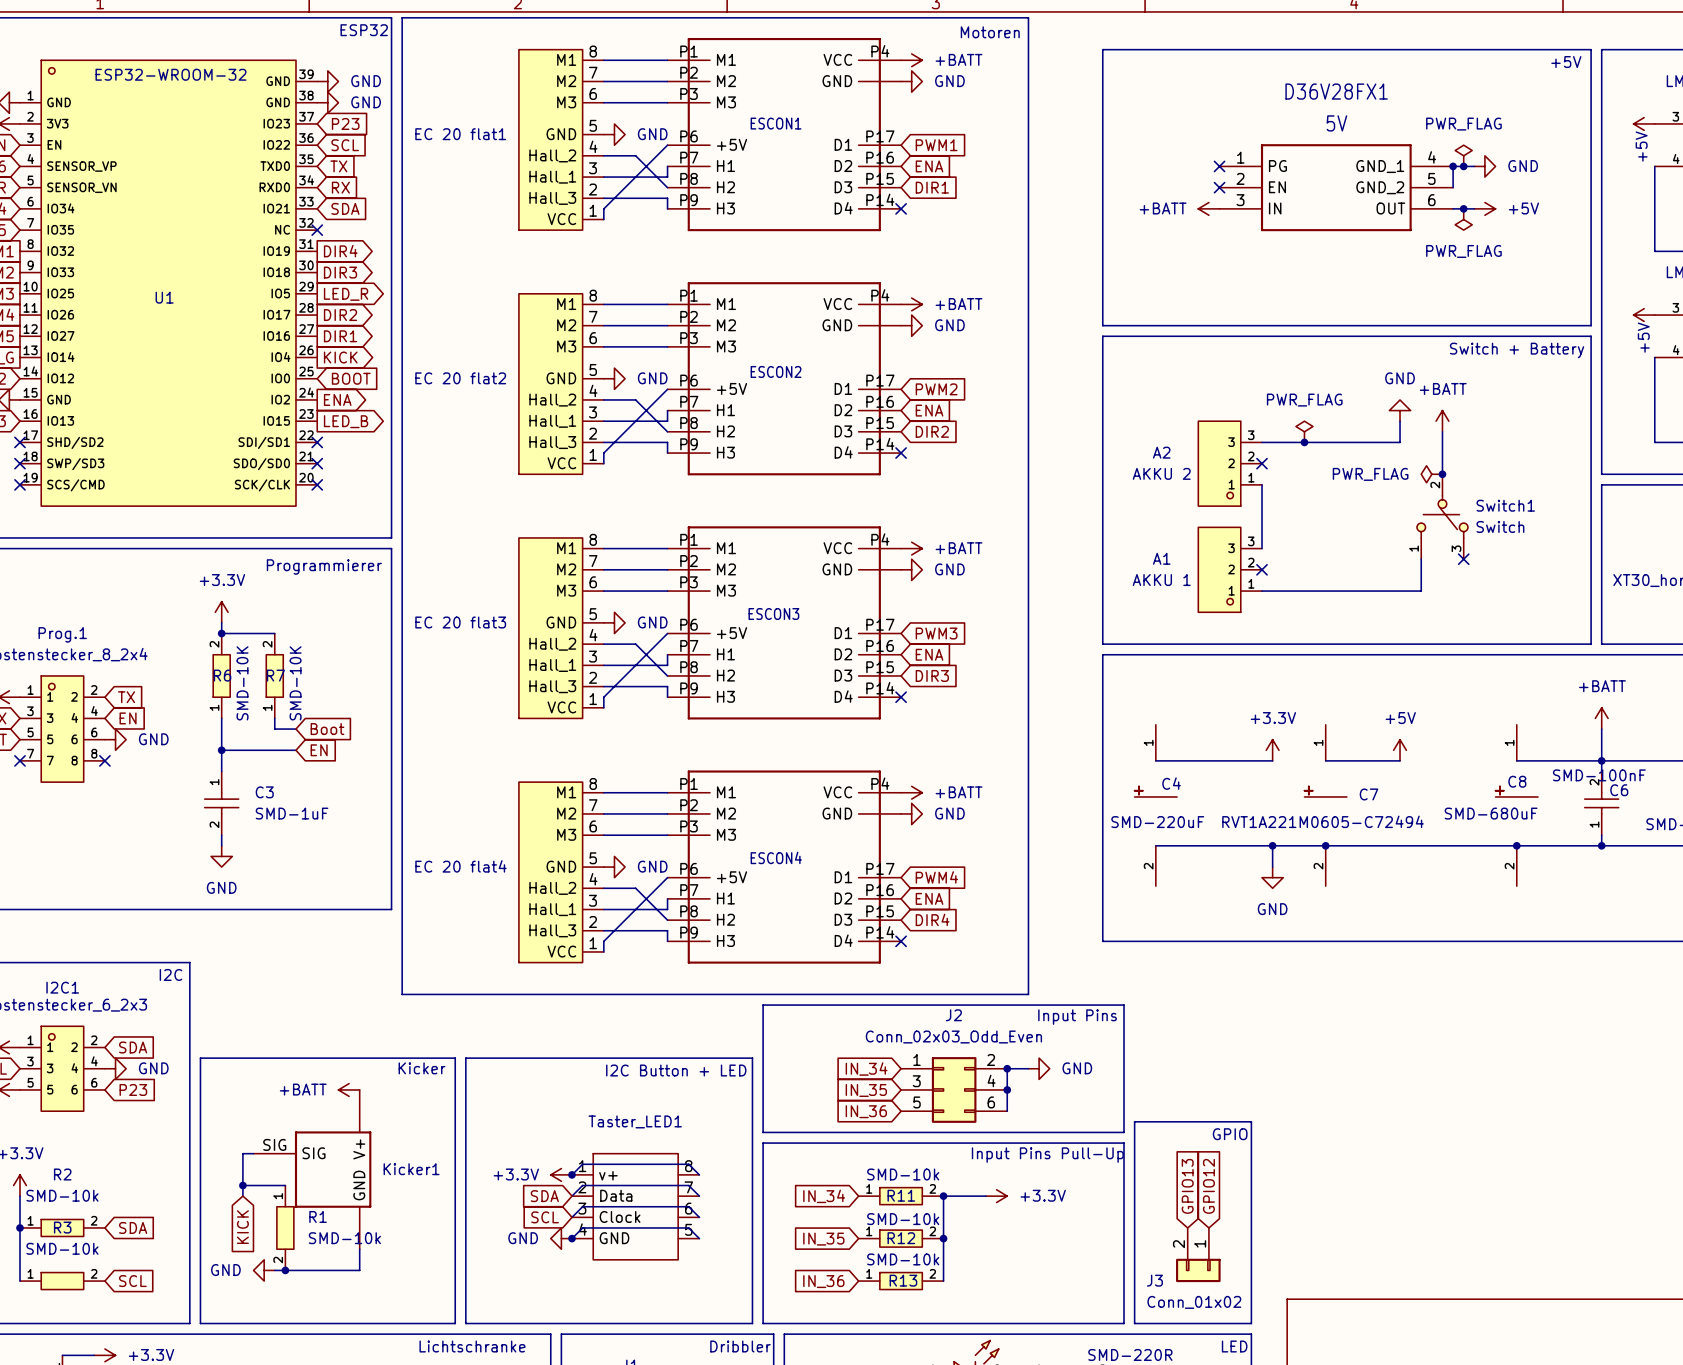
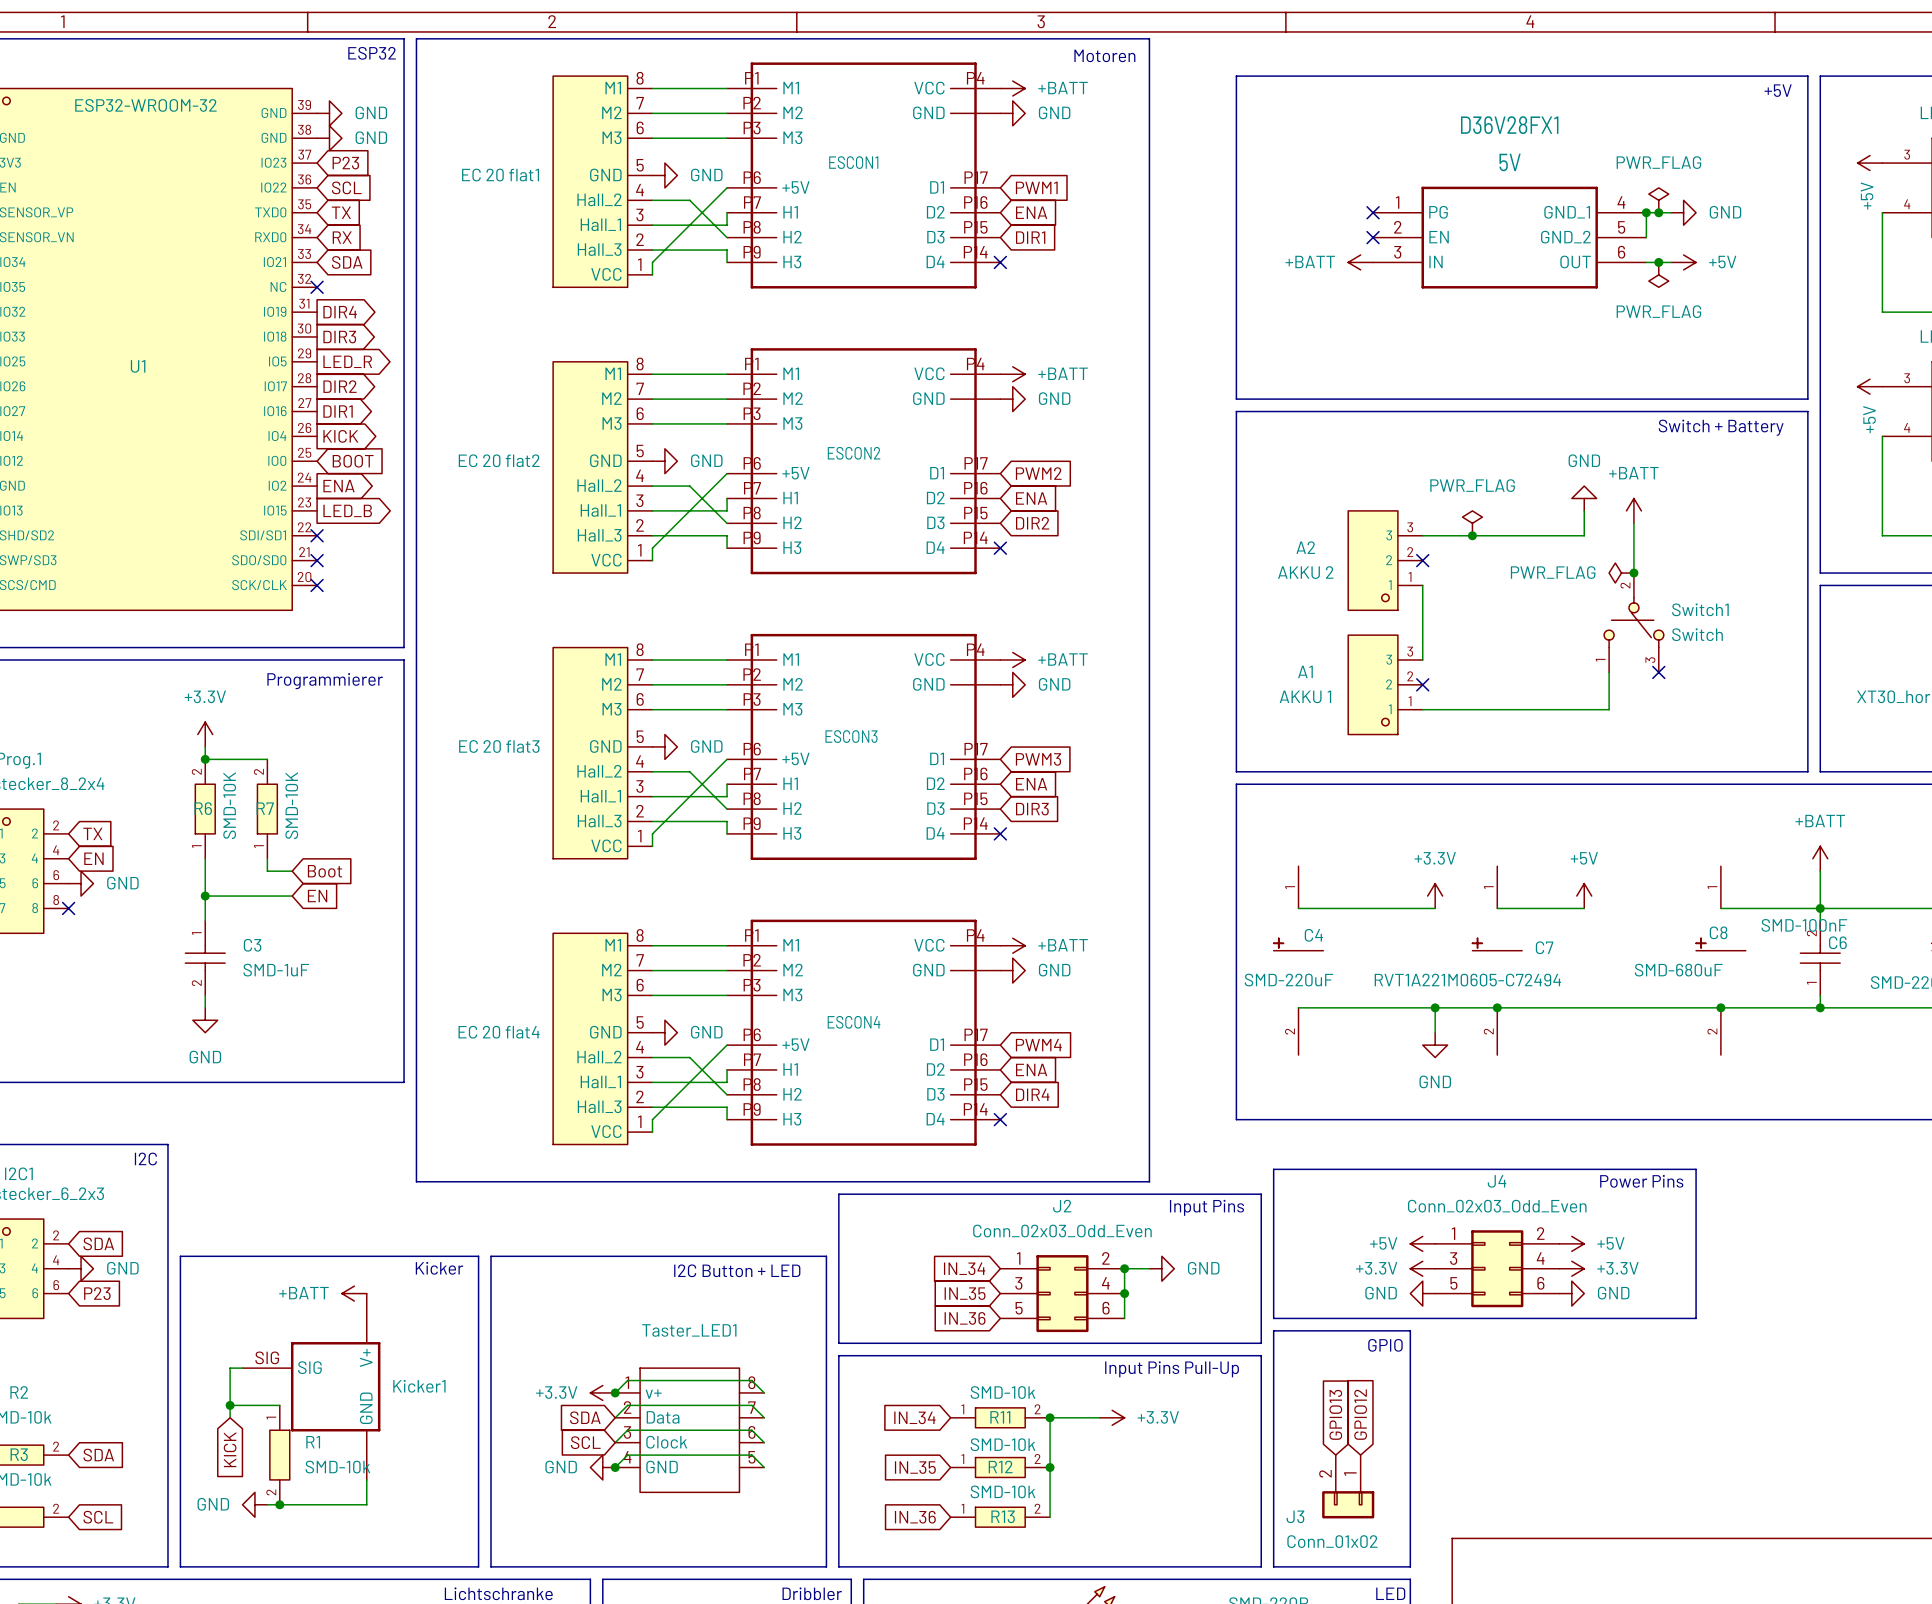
line: none -> (1273, 1169) (1696, 1169) (1696, 1318) (1273, 1318) (1273, 1169)
text: none -> Power Pins (1641, 1181)
power symbol: none -> +5V (1422, 1243)
power symbol: none -> +5V (1571, 1243)
power symbol: none -> +3.3V (1422, 1268)
J4: none -> Conn_02x03_Odd_Even (1497, 1268)
power symbol: none -> +3.3V (1571, 1268)
power symbol: none -> GND (1422, 1293)
power symbol: none -> GND (1571, 1293)

